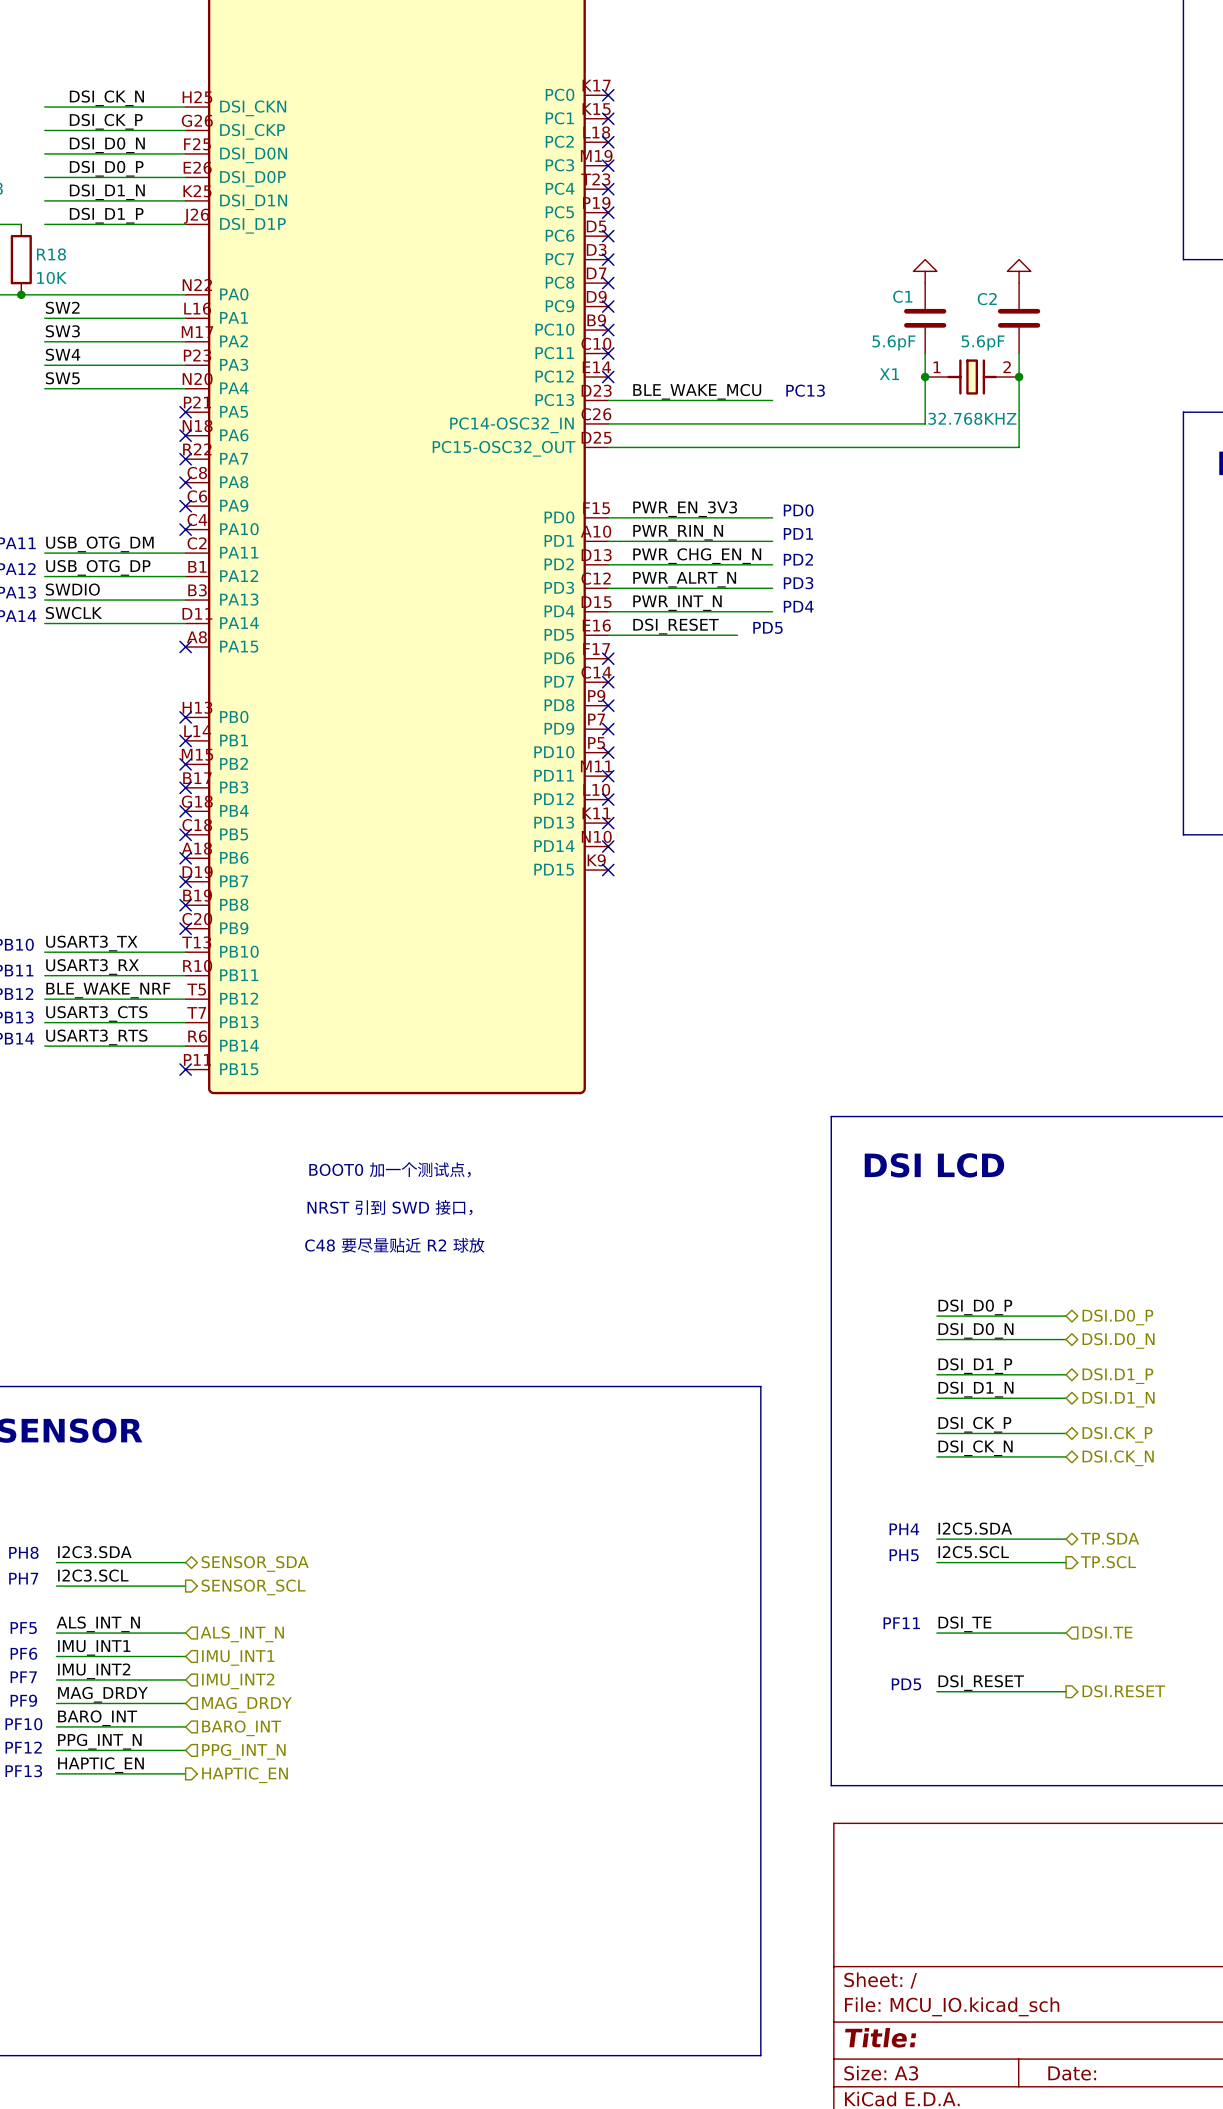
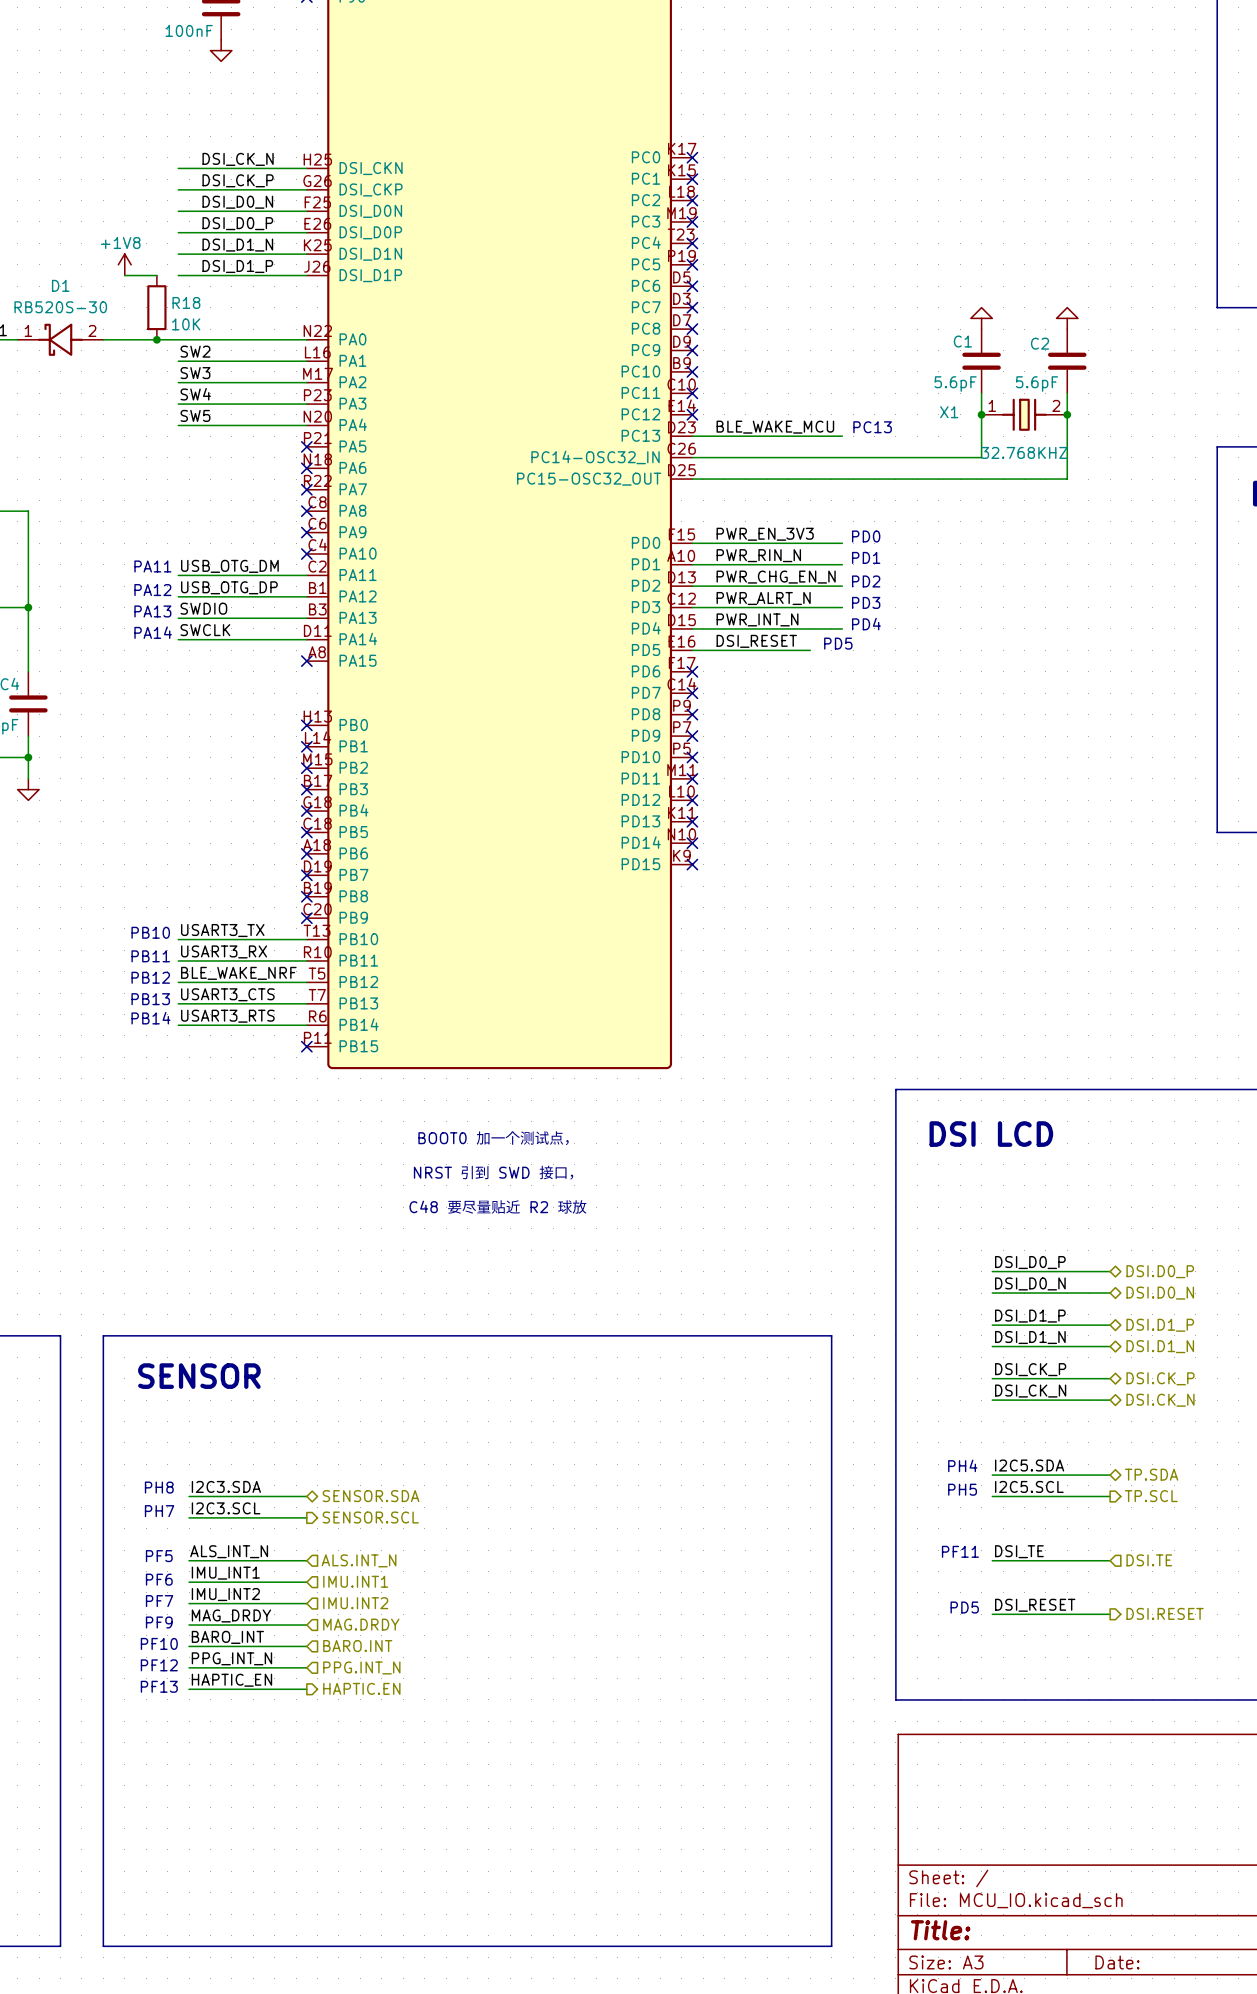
hierarchical label: SENSOR_SDA (255, 1563) -> SENSOR.SDA (371, 1496)
hierarchical label: SENSOR_SCL (253, 1587) -> SENSOR.SCL (370, 1517)
hierarchical label: ALS_INT_N (242, 1634) -> ALS.INT_N (359, 1560)
hierarchical label: IMU_INT1 (238, 1657) -> IMU.INT1 (355, 1581)
hierarchical label: IMU_INT2 (238, 1681) -> IMU.INT2 (355, 1603)
hierarchical label: MAG_DRDY (246, 1704) -> MAG.DRDY (361, 1624)
hierarchical label: BARO_INT (241, 1728) -> BARO.INT (357, 1646)
hierarchical label: PPG_INT_N (243, 1751) -> PPG.INT_N (361, 1667)
hierarchical label: HAPTIC_EN (245, 1775) -> HAPTIC.EN (361, 1688)

